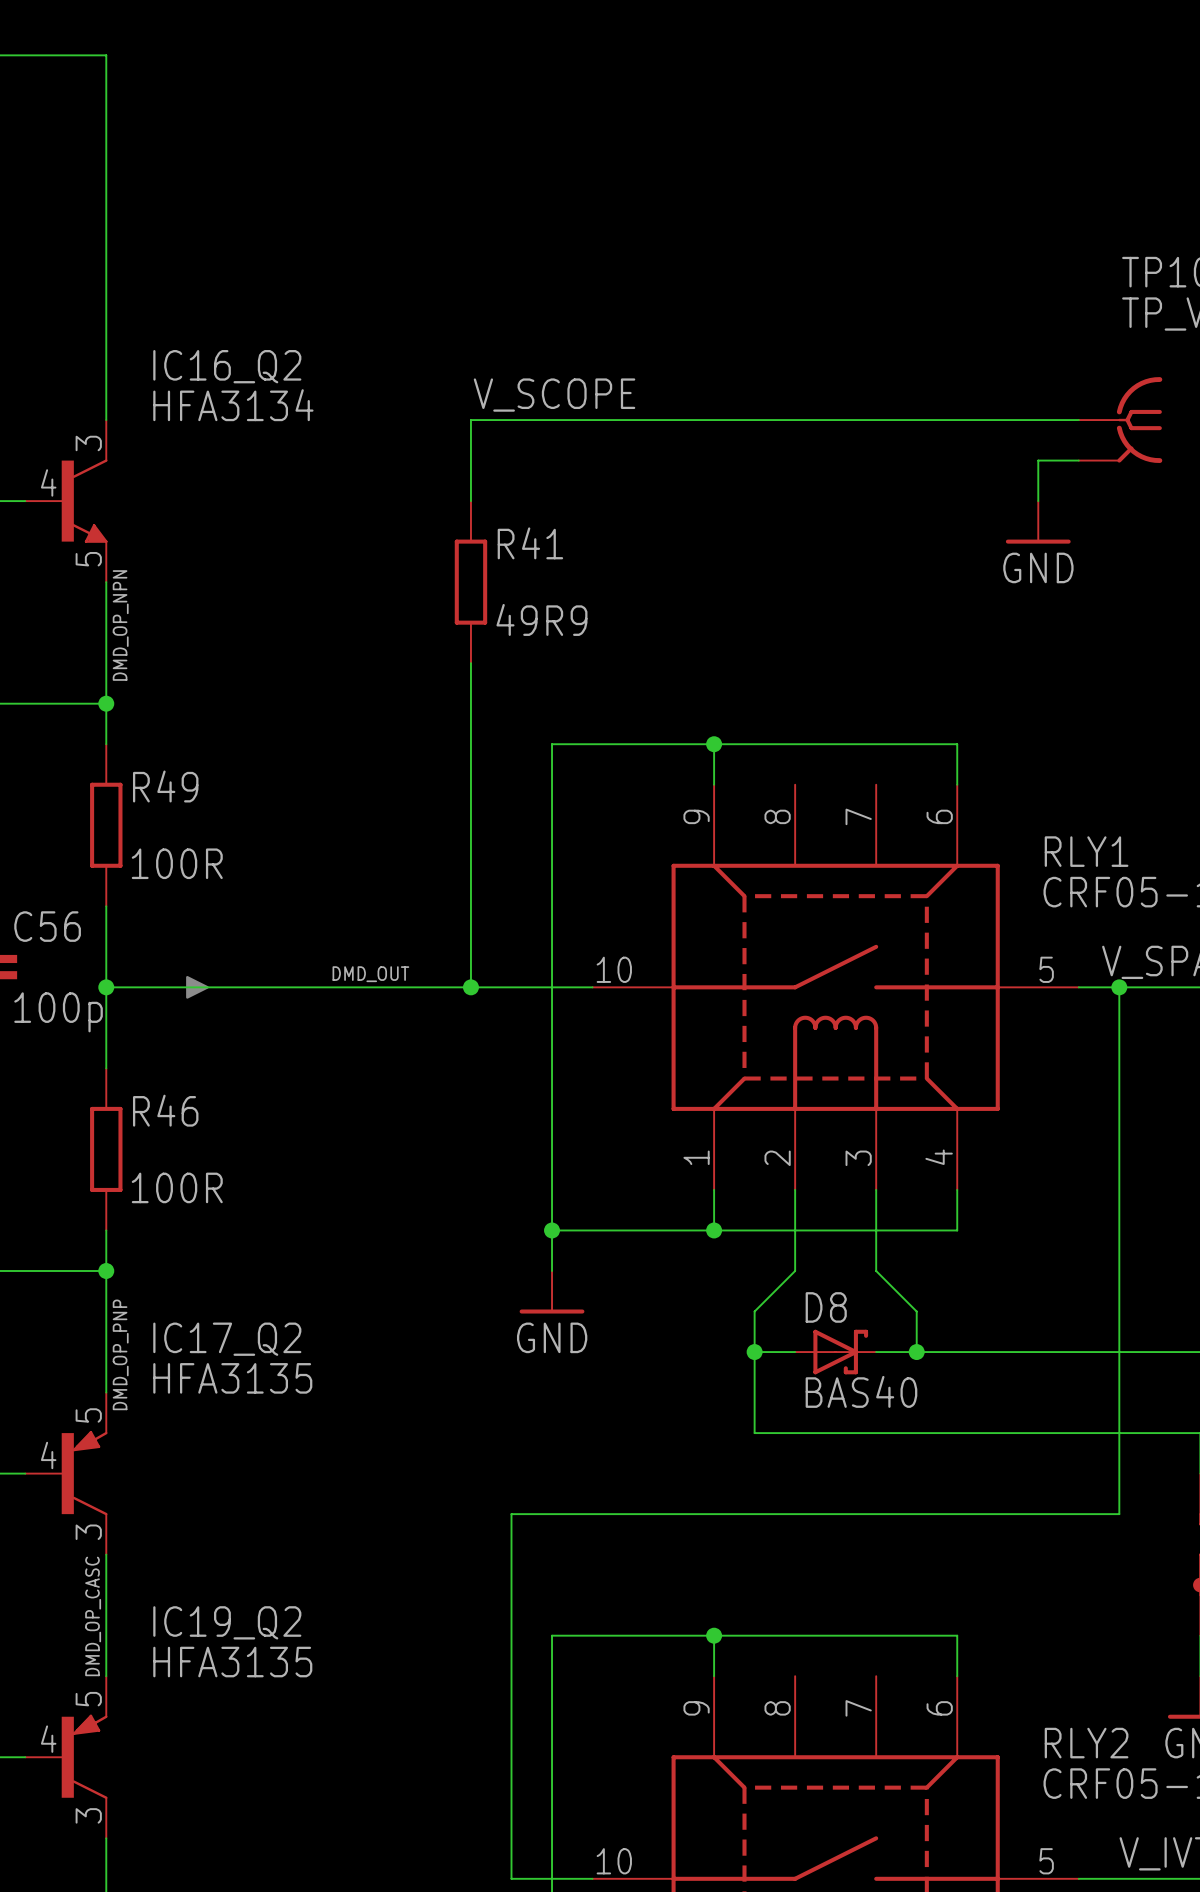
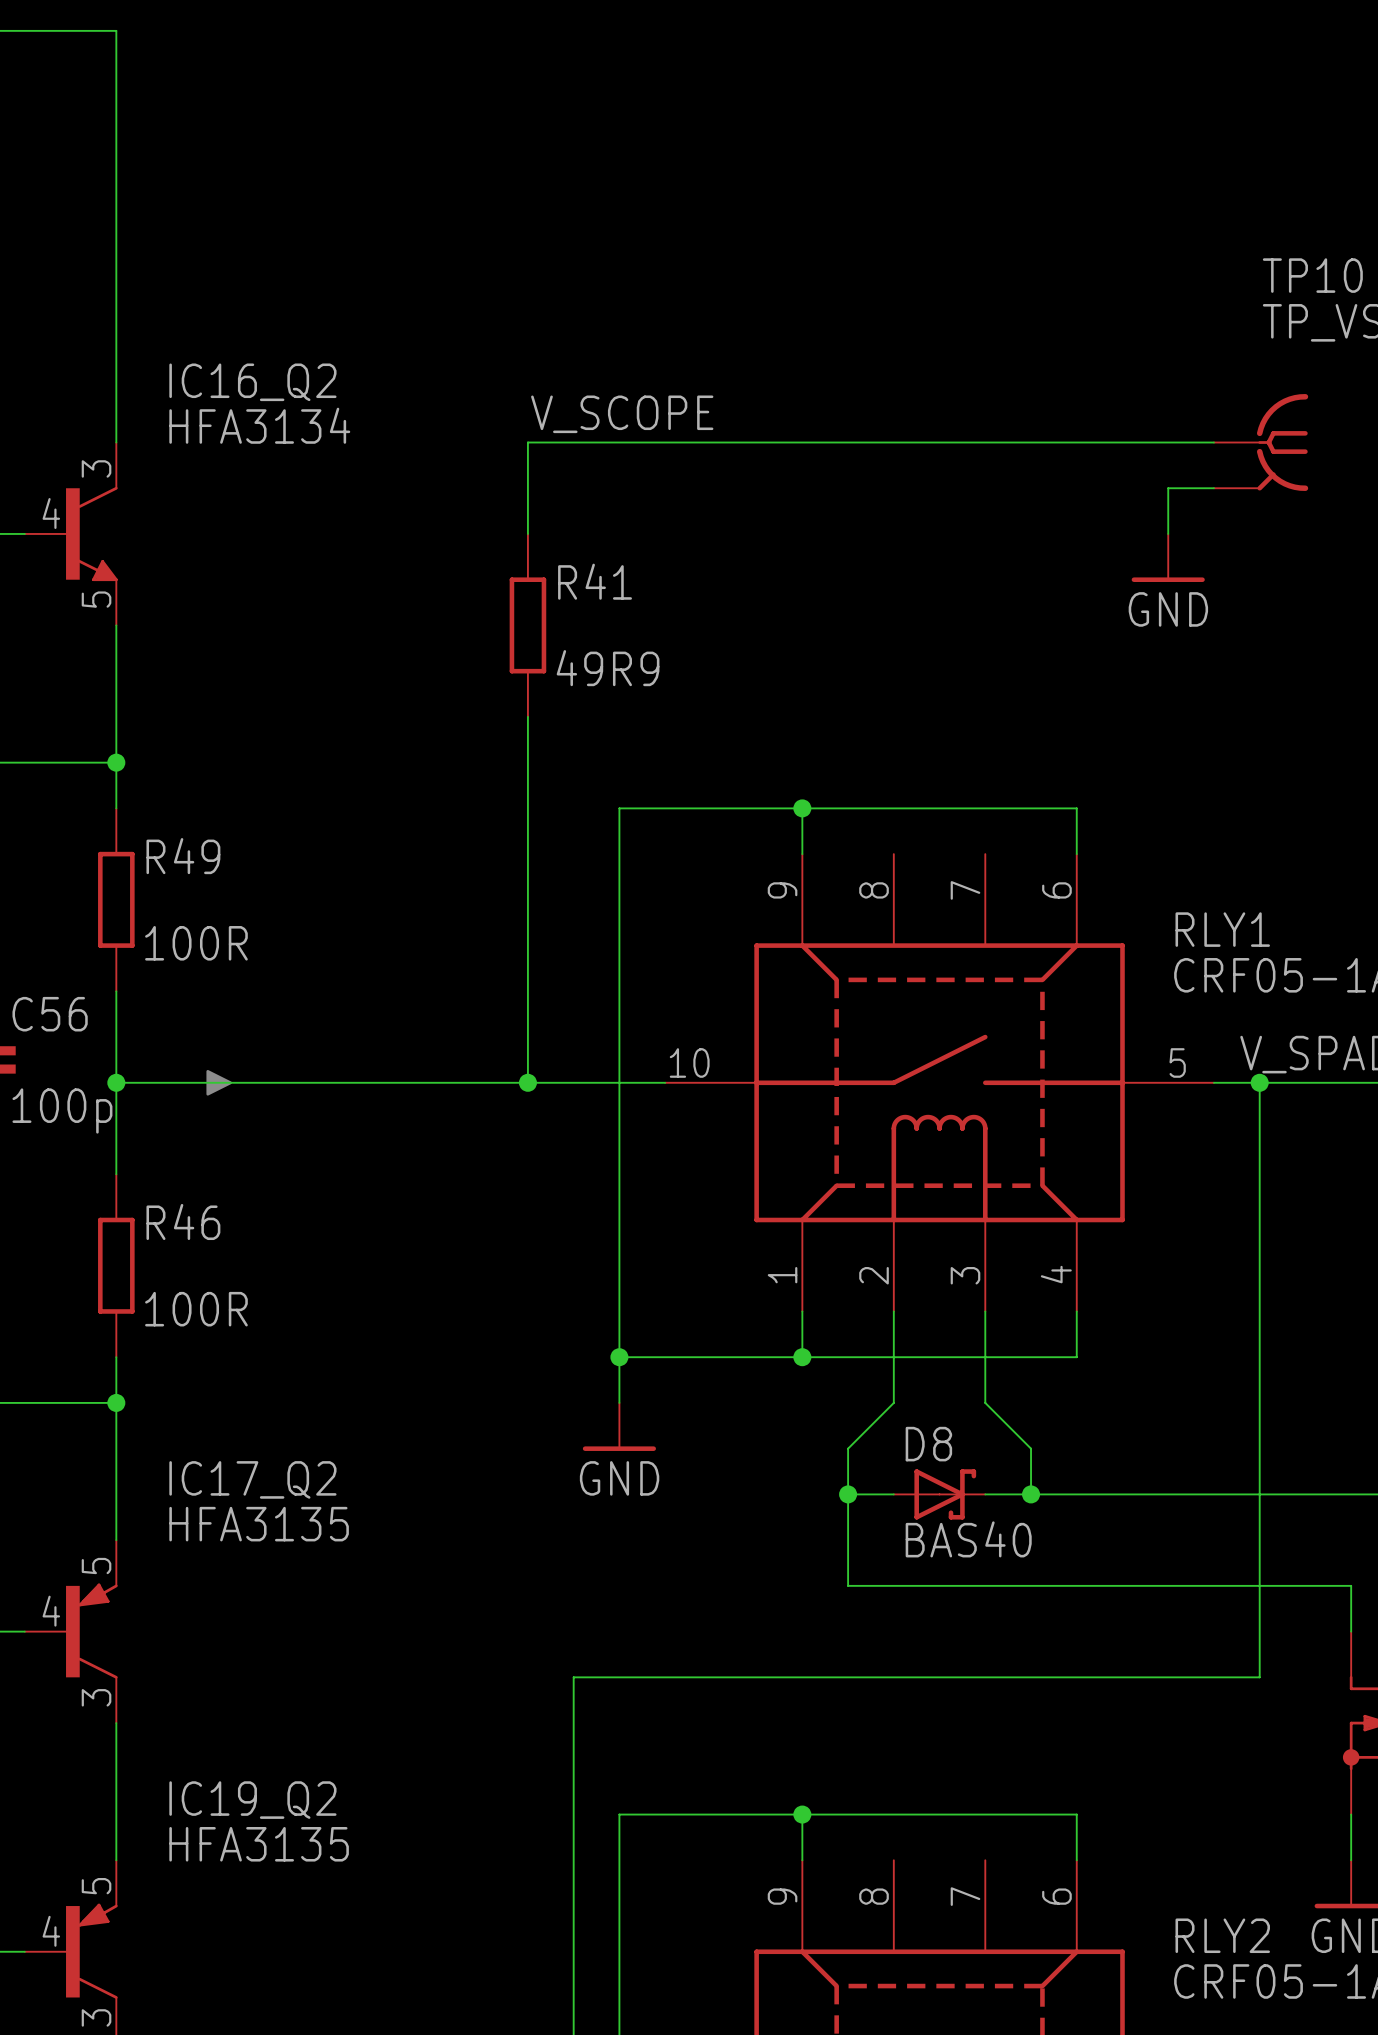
label: DMD_OP_NPN (120, 625) -> none
label: DMD_OUT (370, 974) -> none
label: DMD_OP_PNP (120, 1354) -> none
label: DMD_OP_CASC (93, 1616) -> none

